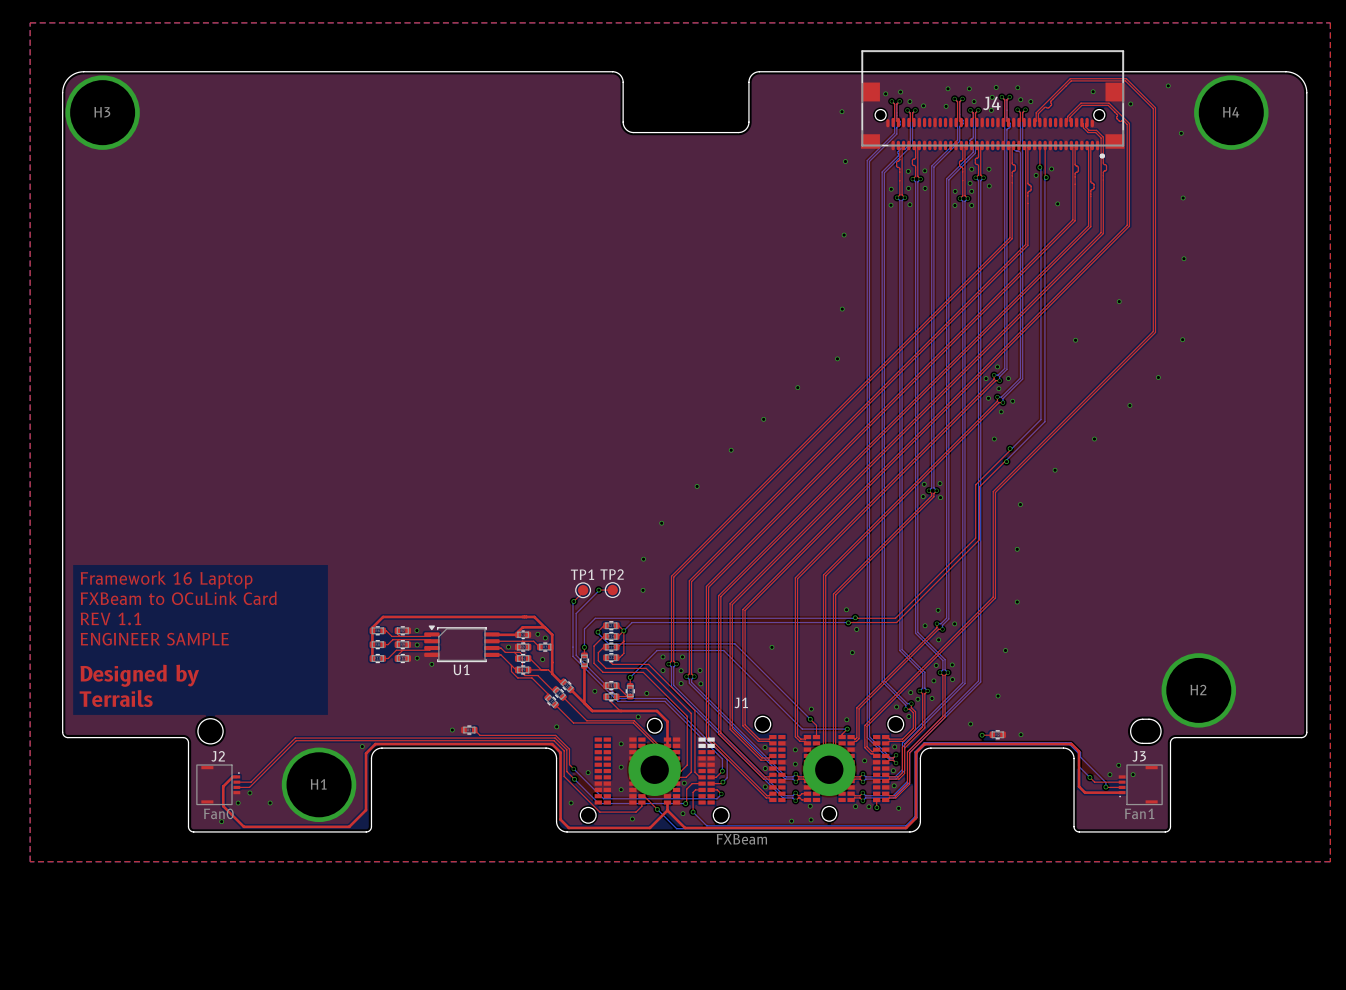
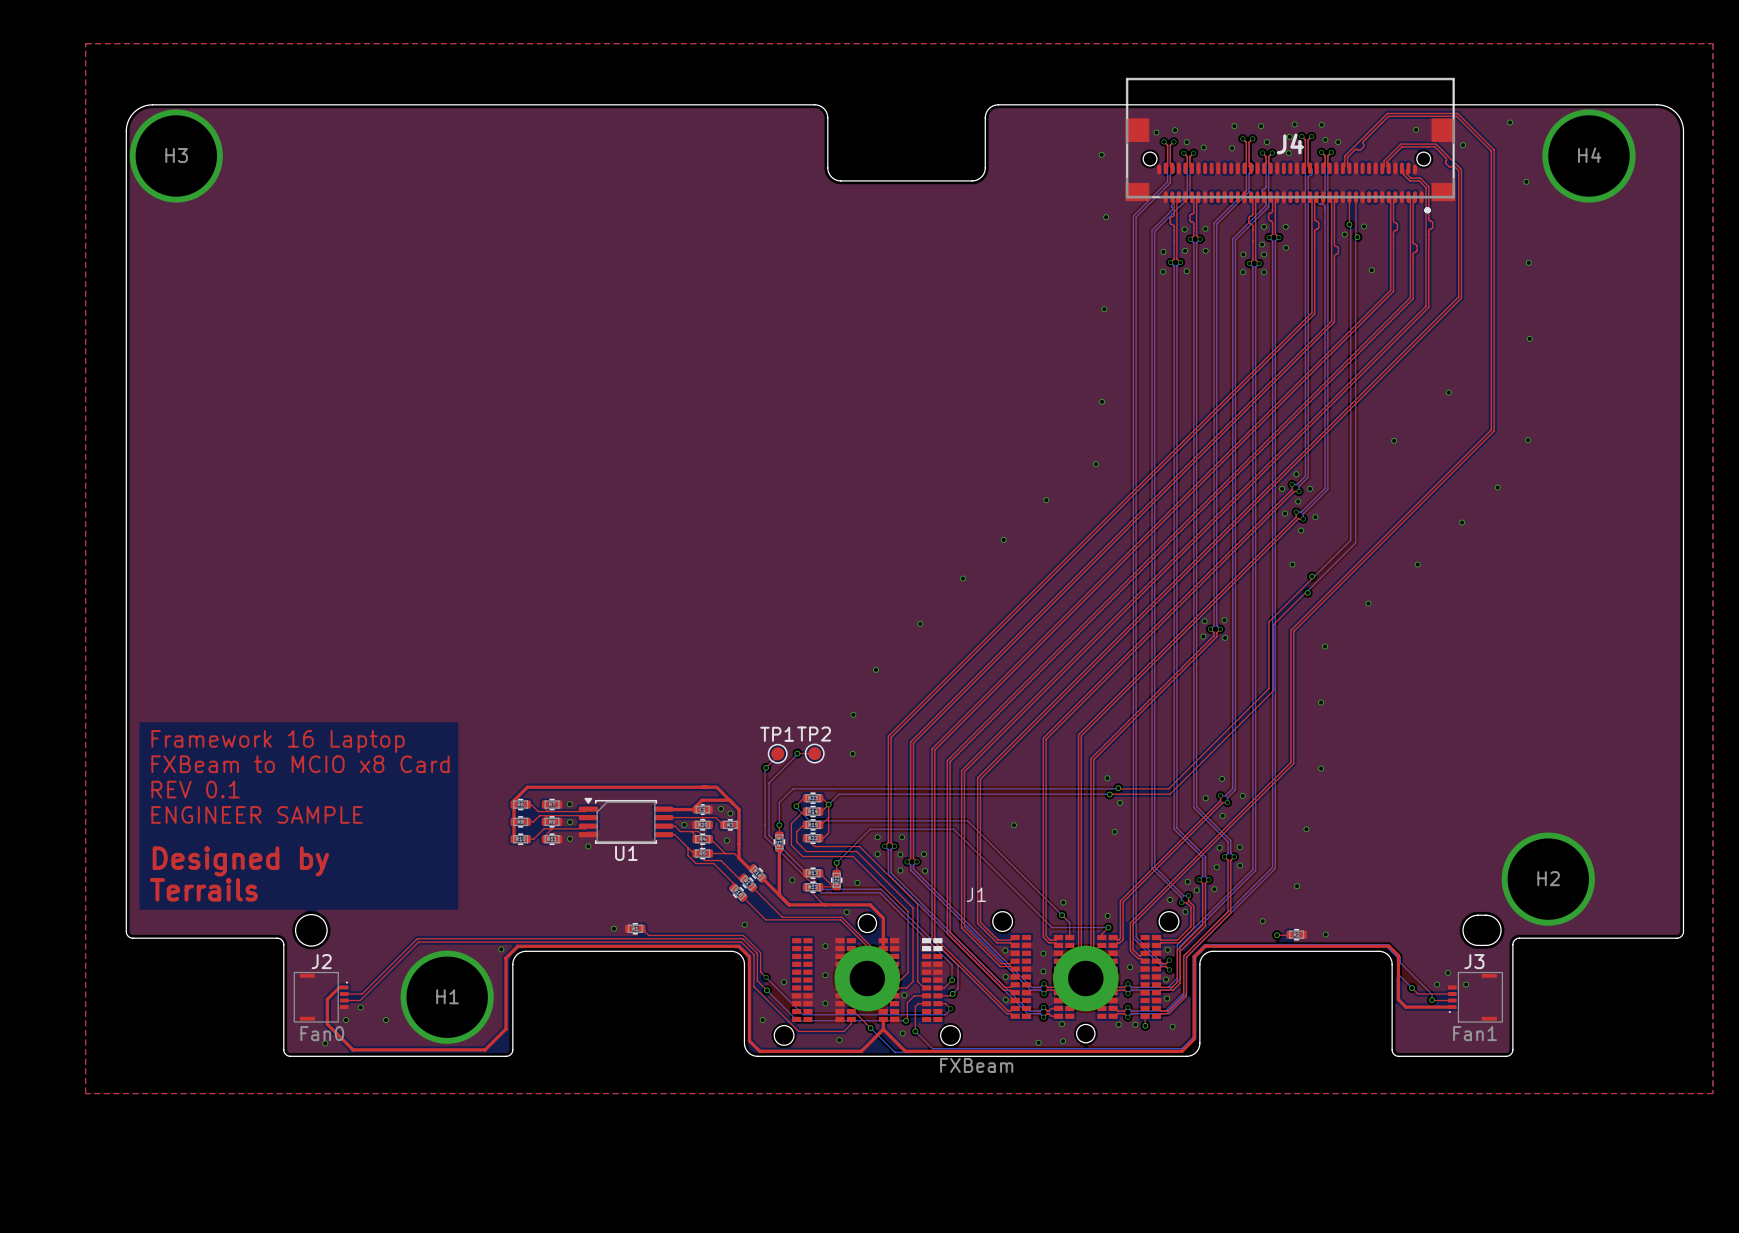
text: FXBeam to OCuLink Card (178, 598) -> FXBeam to MCIO x8 Card (300, 764)
text: REV 1.1 (110, 618) -> REV 0.1 (195, 789)

